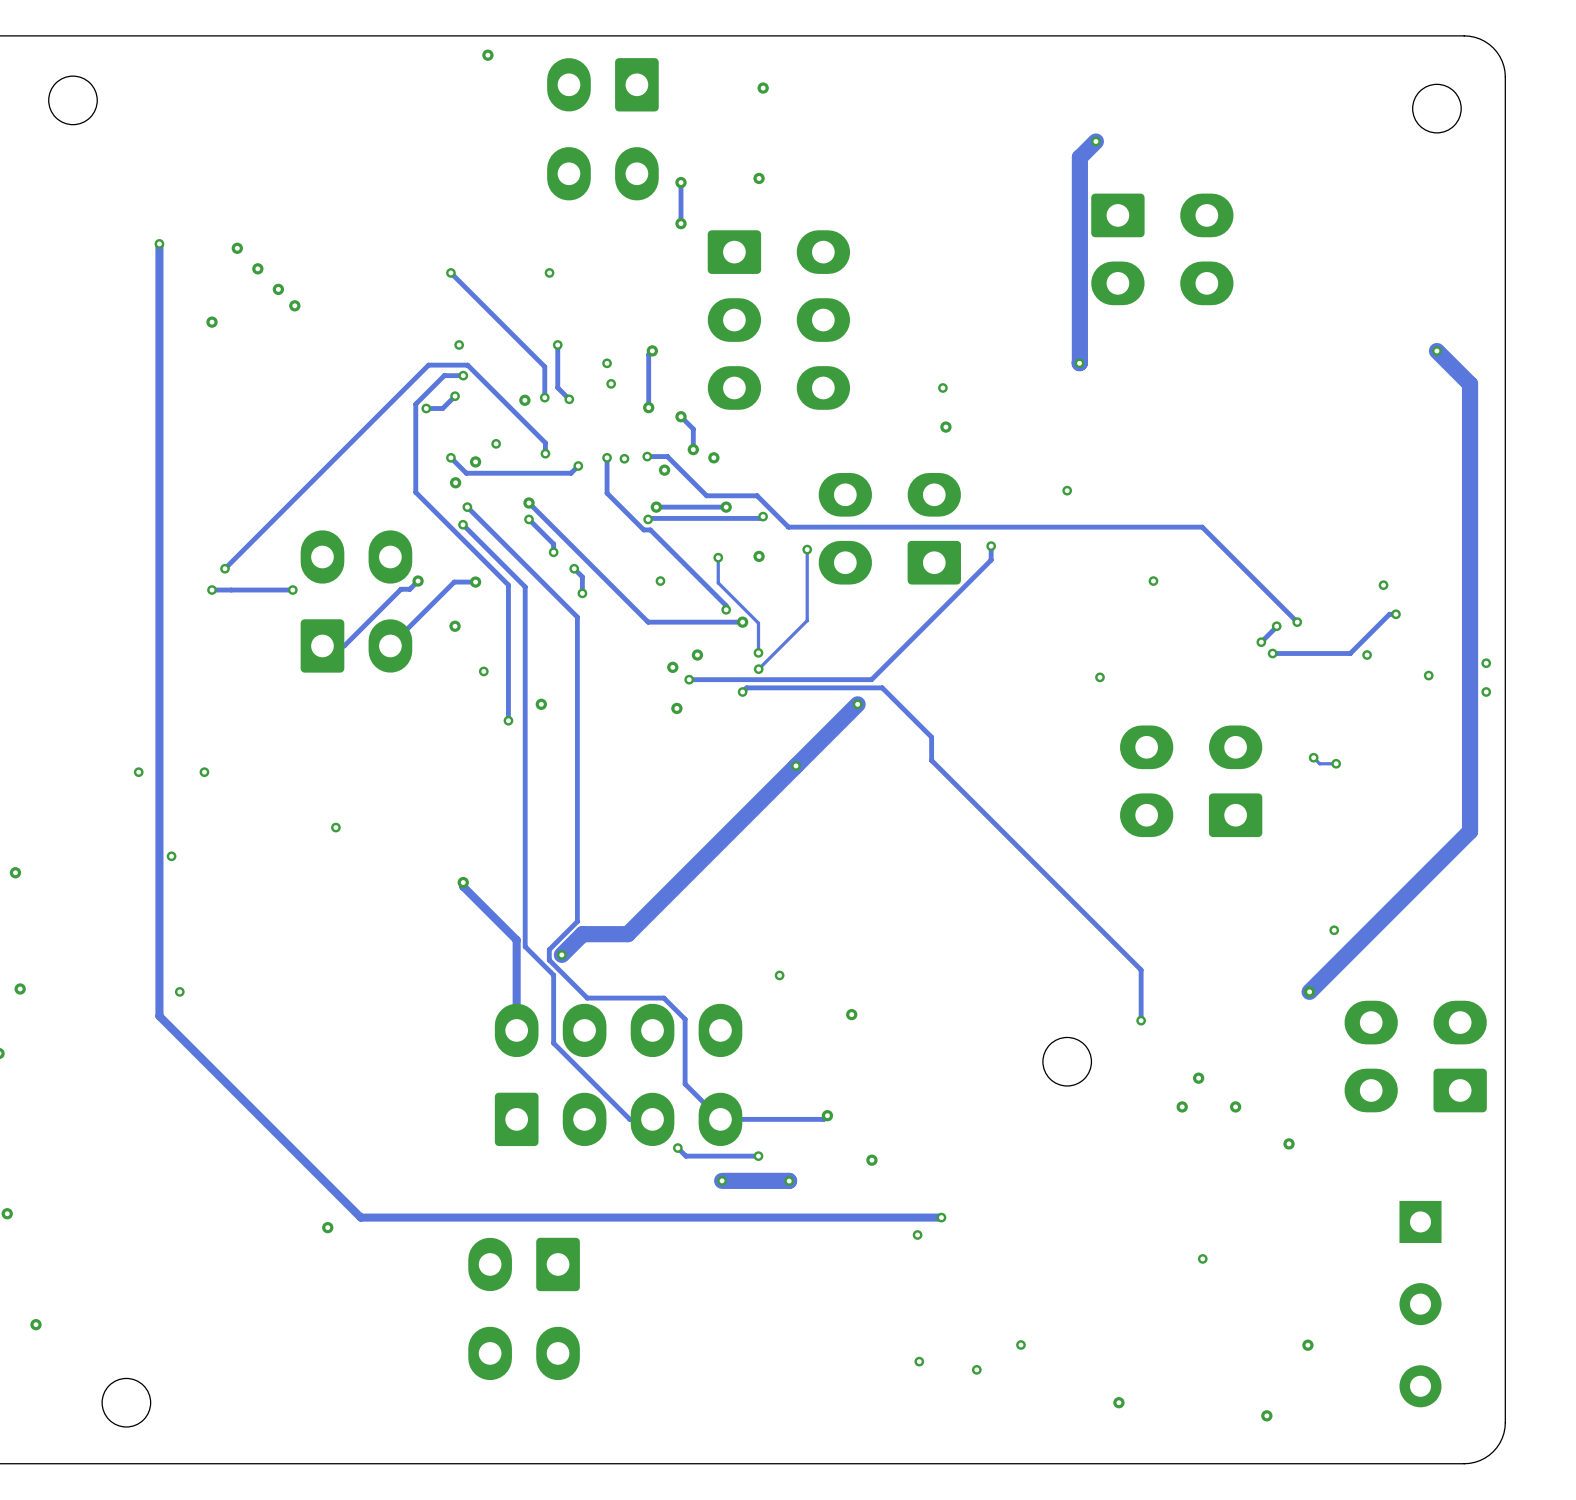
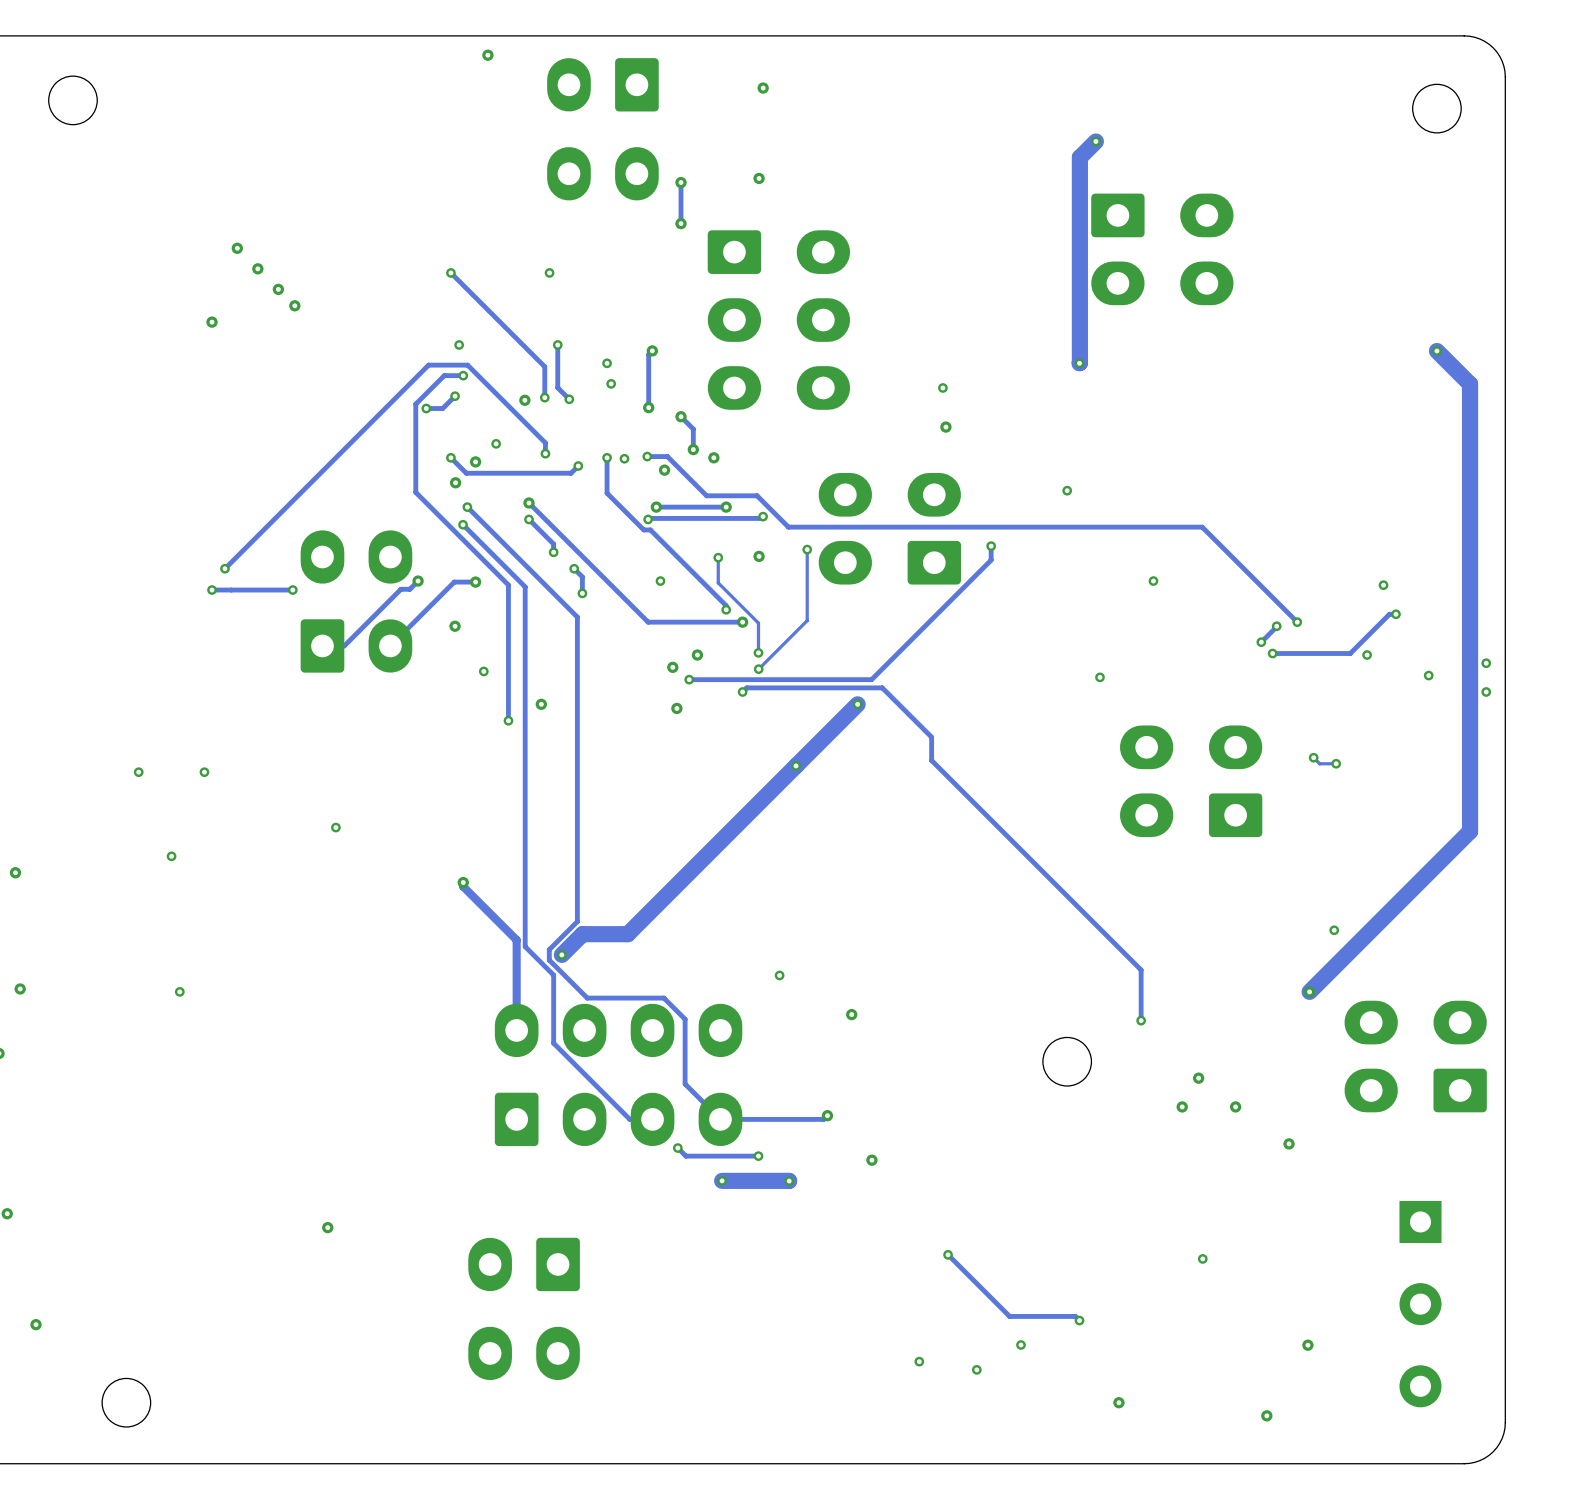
track: (159, 243) (159, 1016) (360, 1217) (941, 1217) -> none
via: (159, 243) -> none
via: (941, 1217) -> none
via: (917, 1235) -> none
track: none -> (948, 1254) (1009, 1316) (1075, 1316) (1079, 1320)
via: none -> (948, 1254)
via: none -> (1079, 1320)

